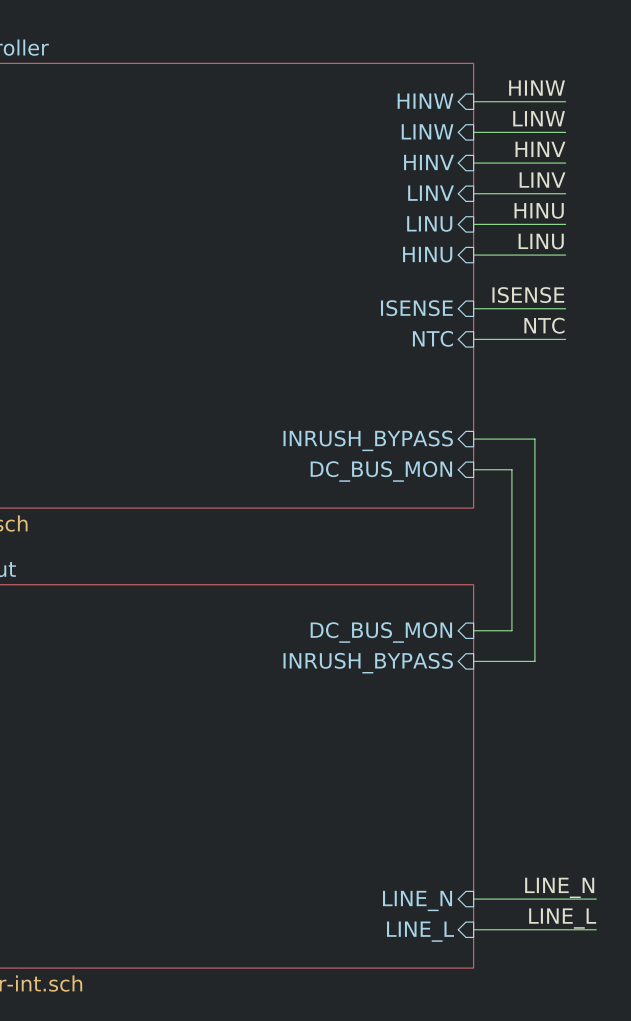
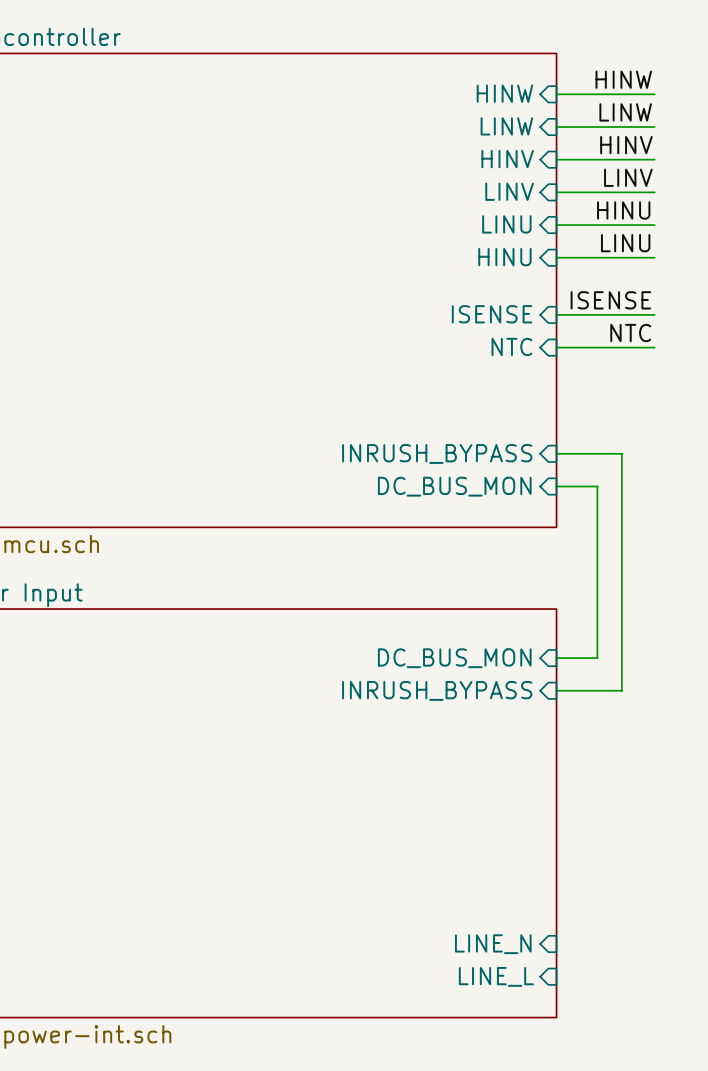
label: LINE_N (559, 887) -> none
wire: (473, 899) (596, 899) -> none
label: LINE_L (562, 918) -> none
wire: (473, 929) (596, 929) -> none

